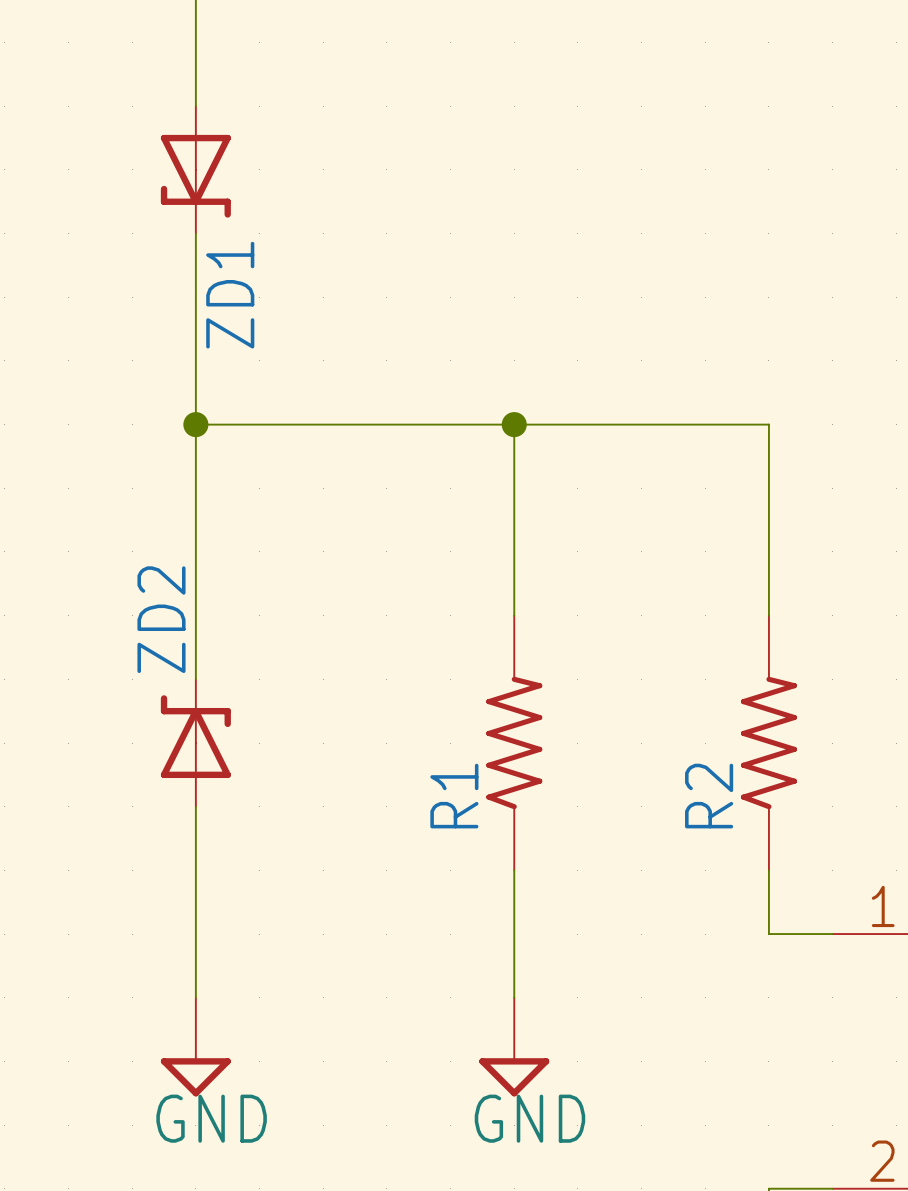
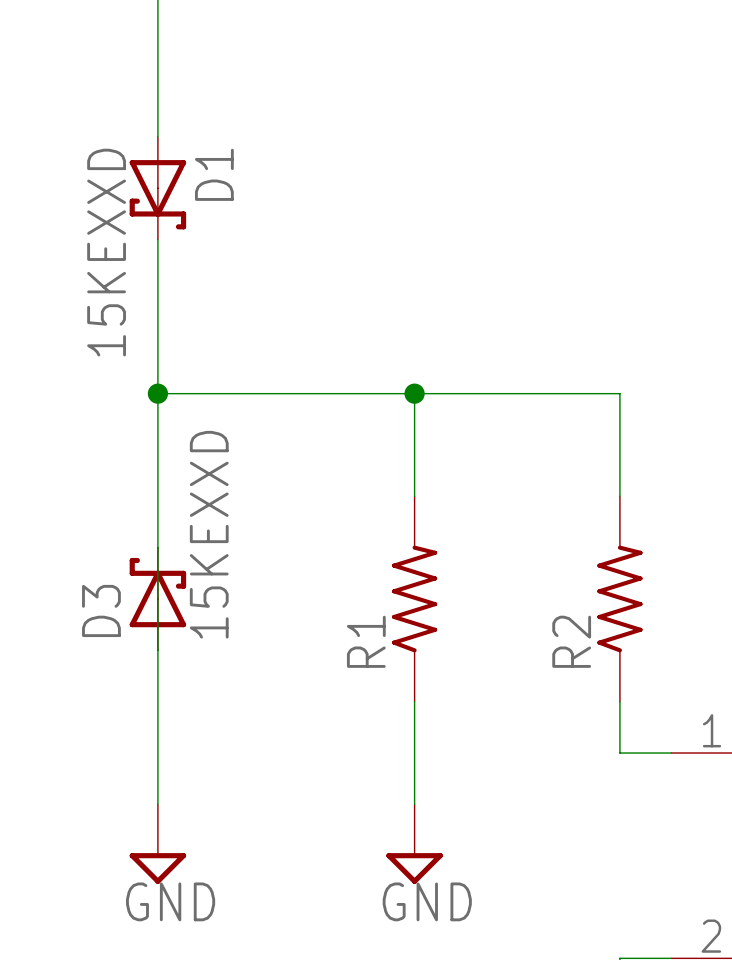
ZD1: (195, 169) -> none
D1: none -> 15KEXXD (157, 188)
wire: (195, 424) (768, 424) (768, 488) -> (157, 393) (619, 393)
junction position: (195, 424) -> (157, 393)
wire: (514, 424) (514, 488) -> none
junction position: (514, 424) -> (414, 393)
ZD2: (195, 743) -> none
D3: none -> 15KEXXD (157, 599)

